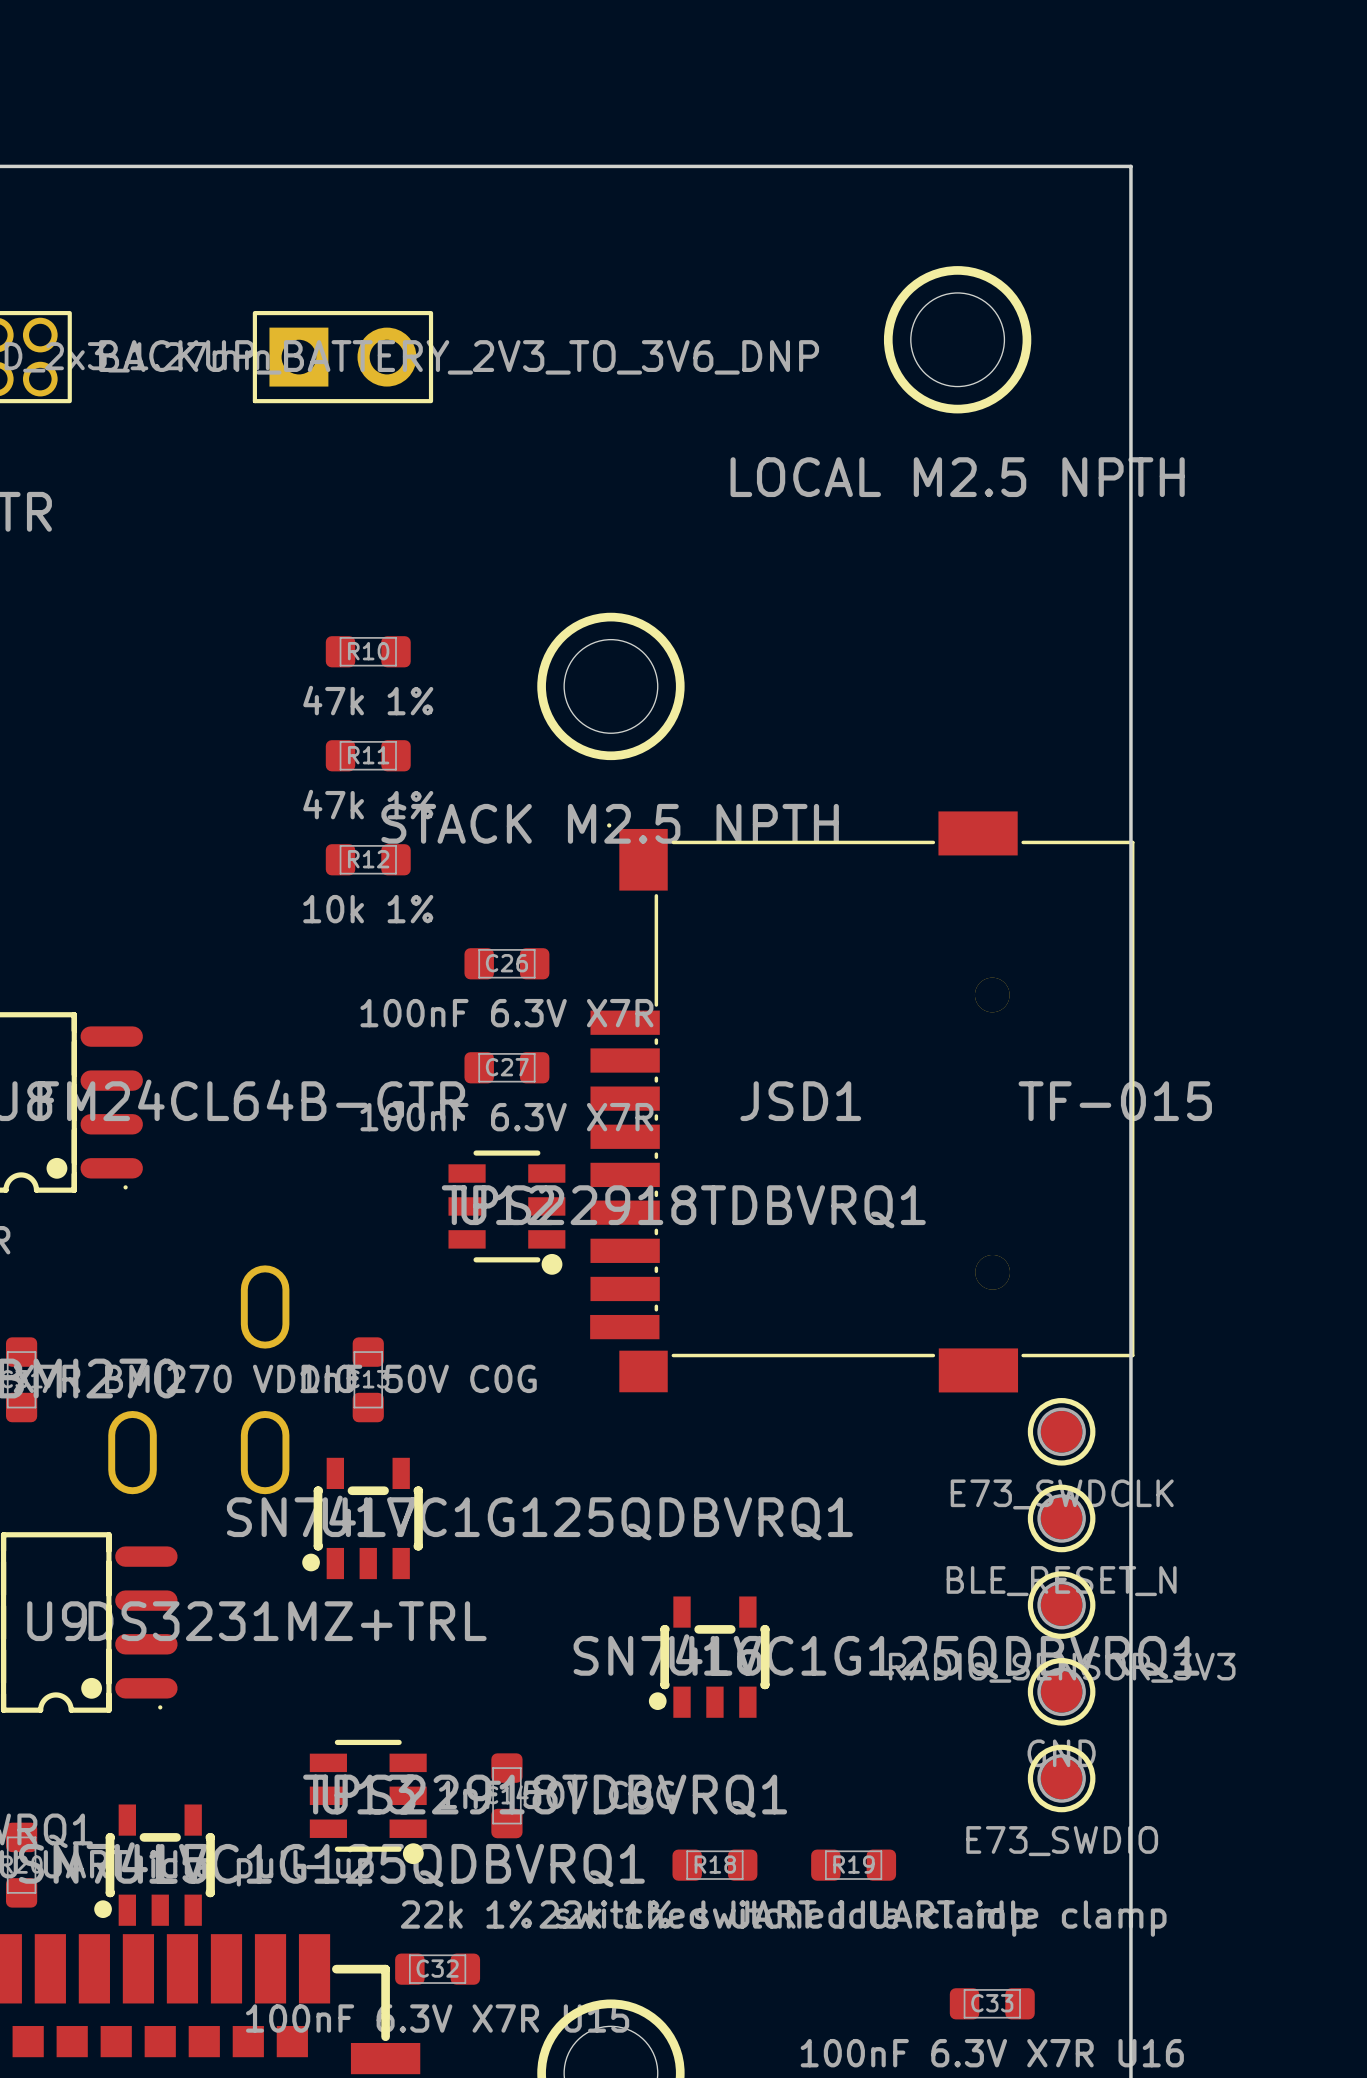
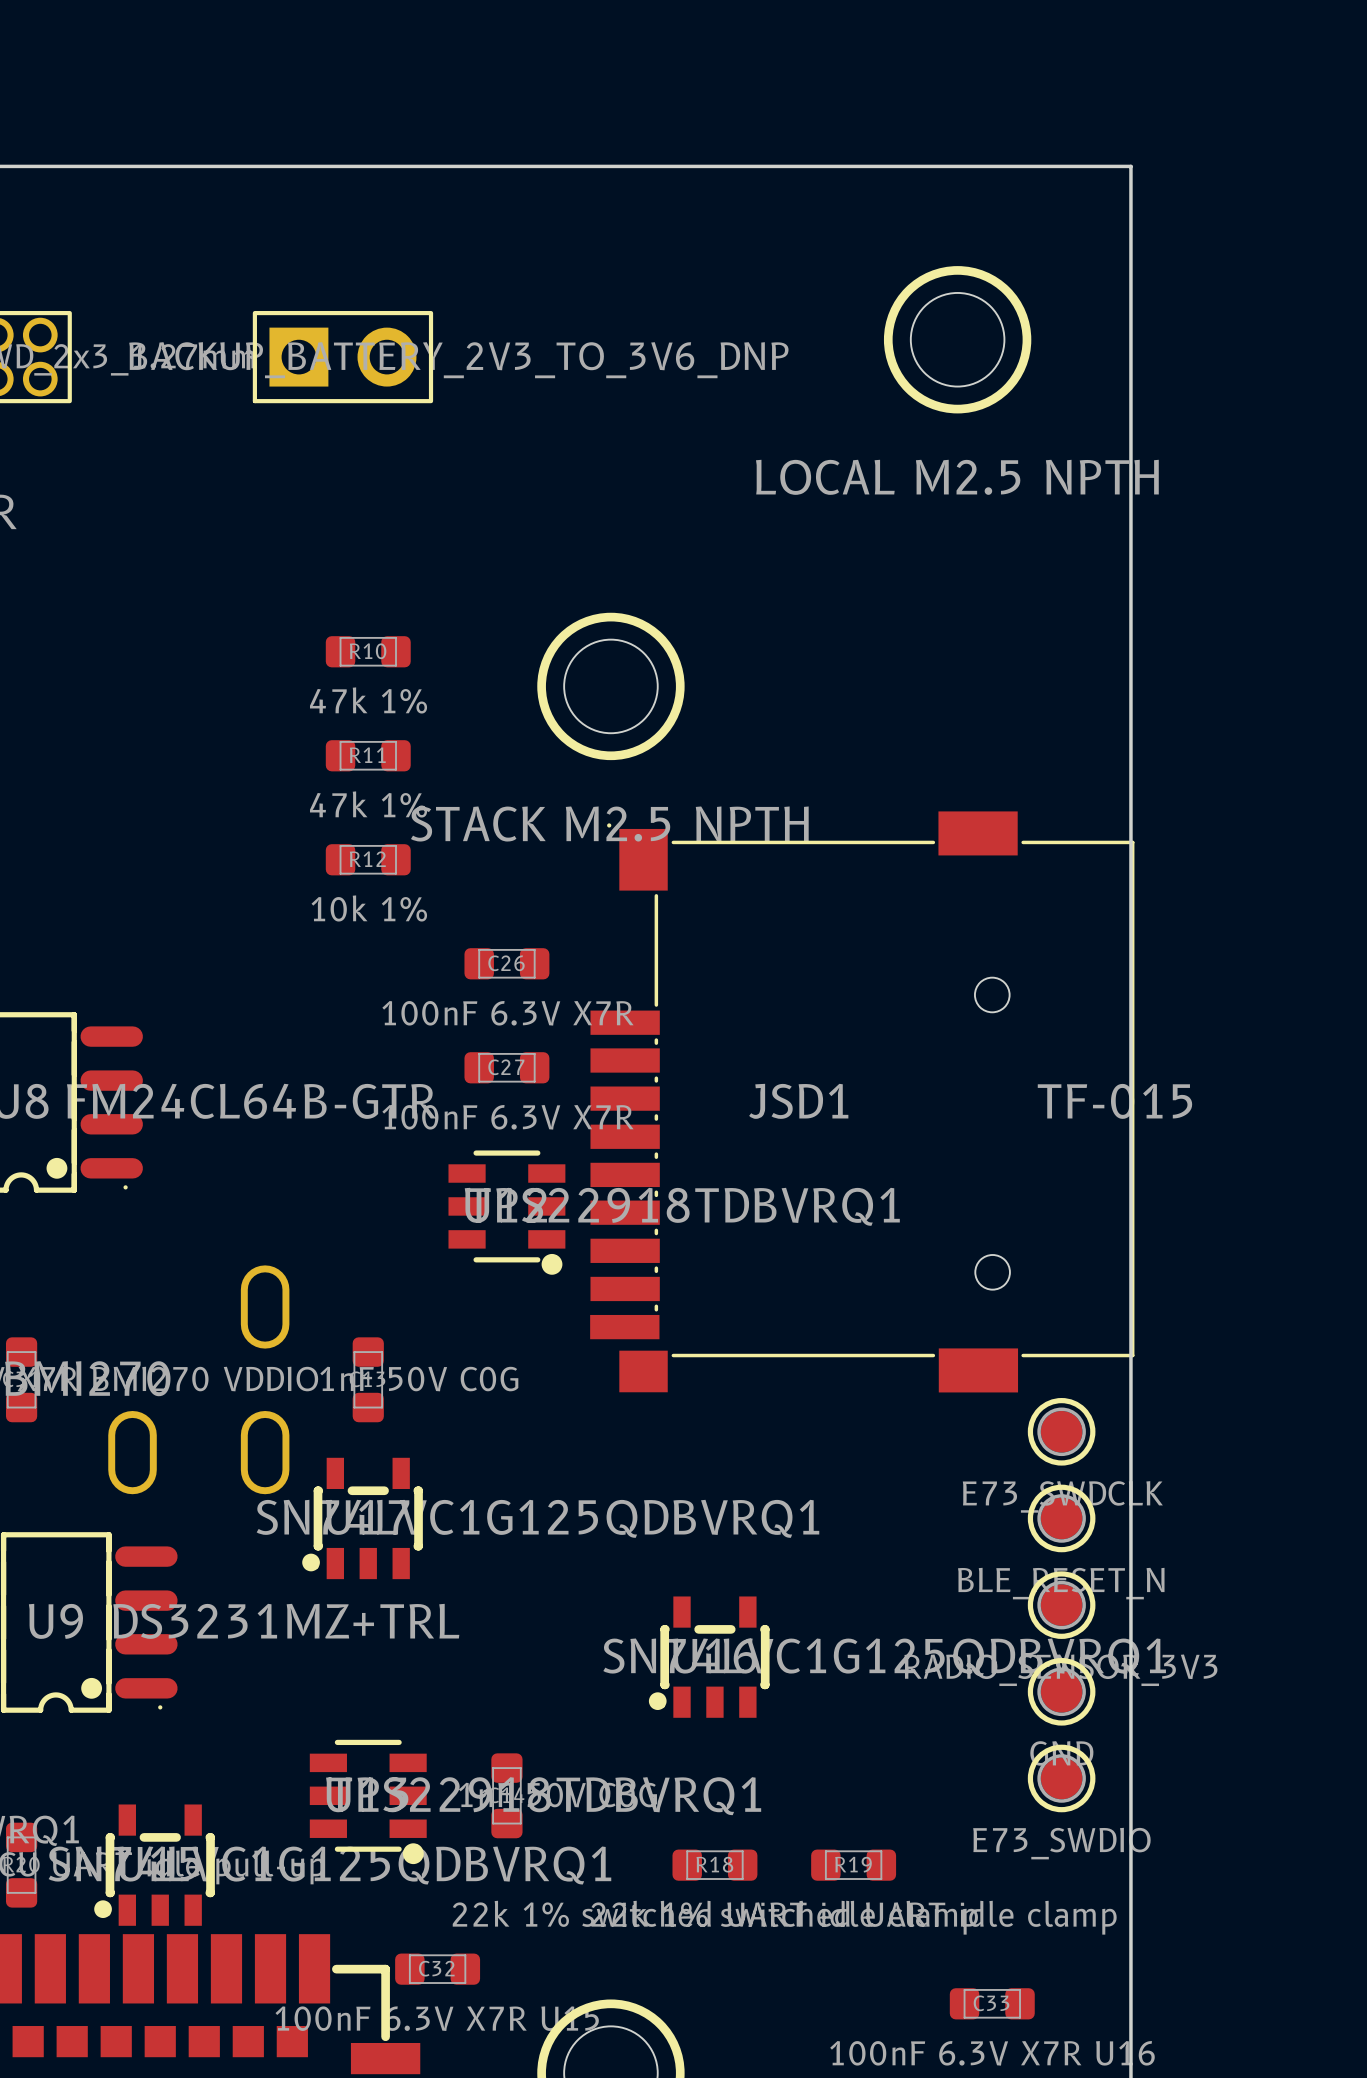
JSD1 footprint: [590, 811, 1135, 1393] -> [590, 811, 1135, 1393]

